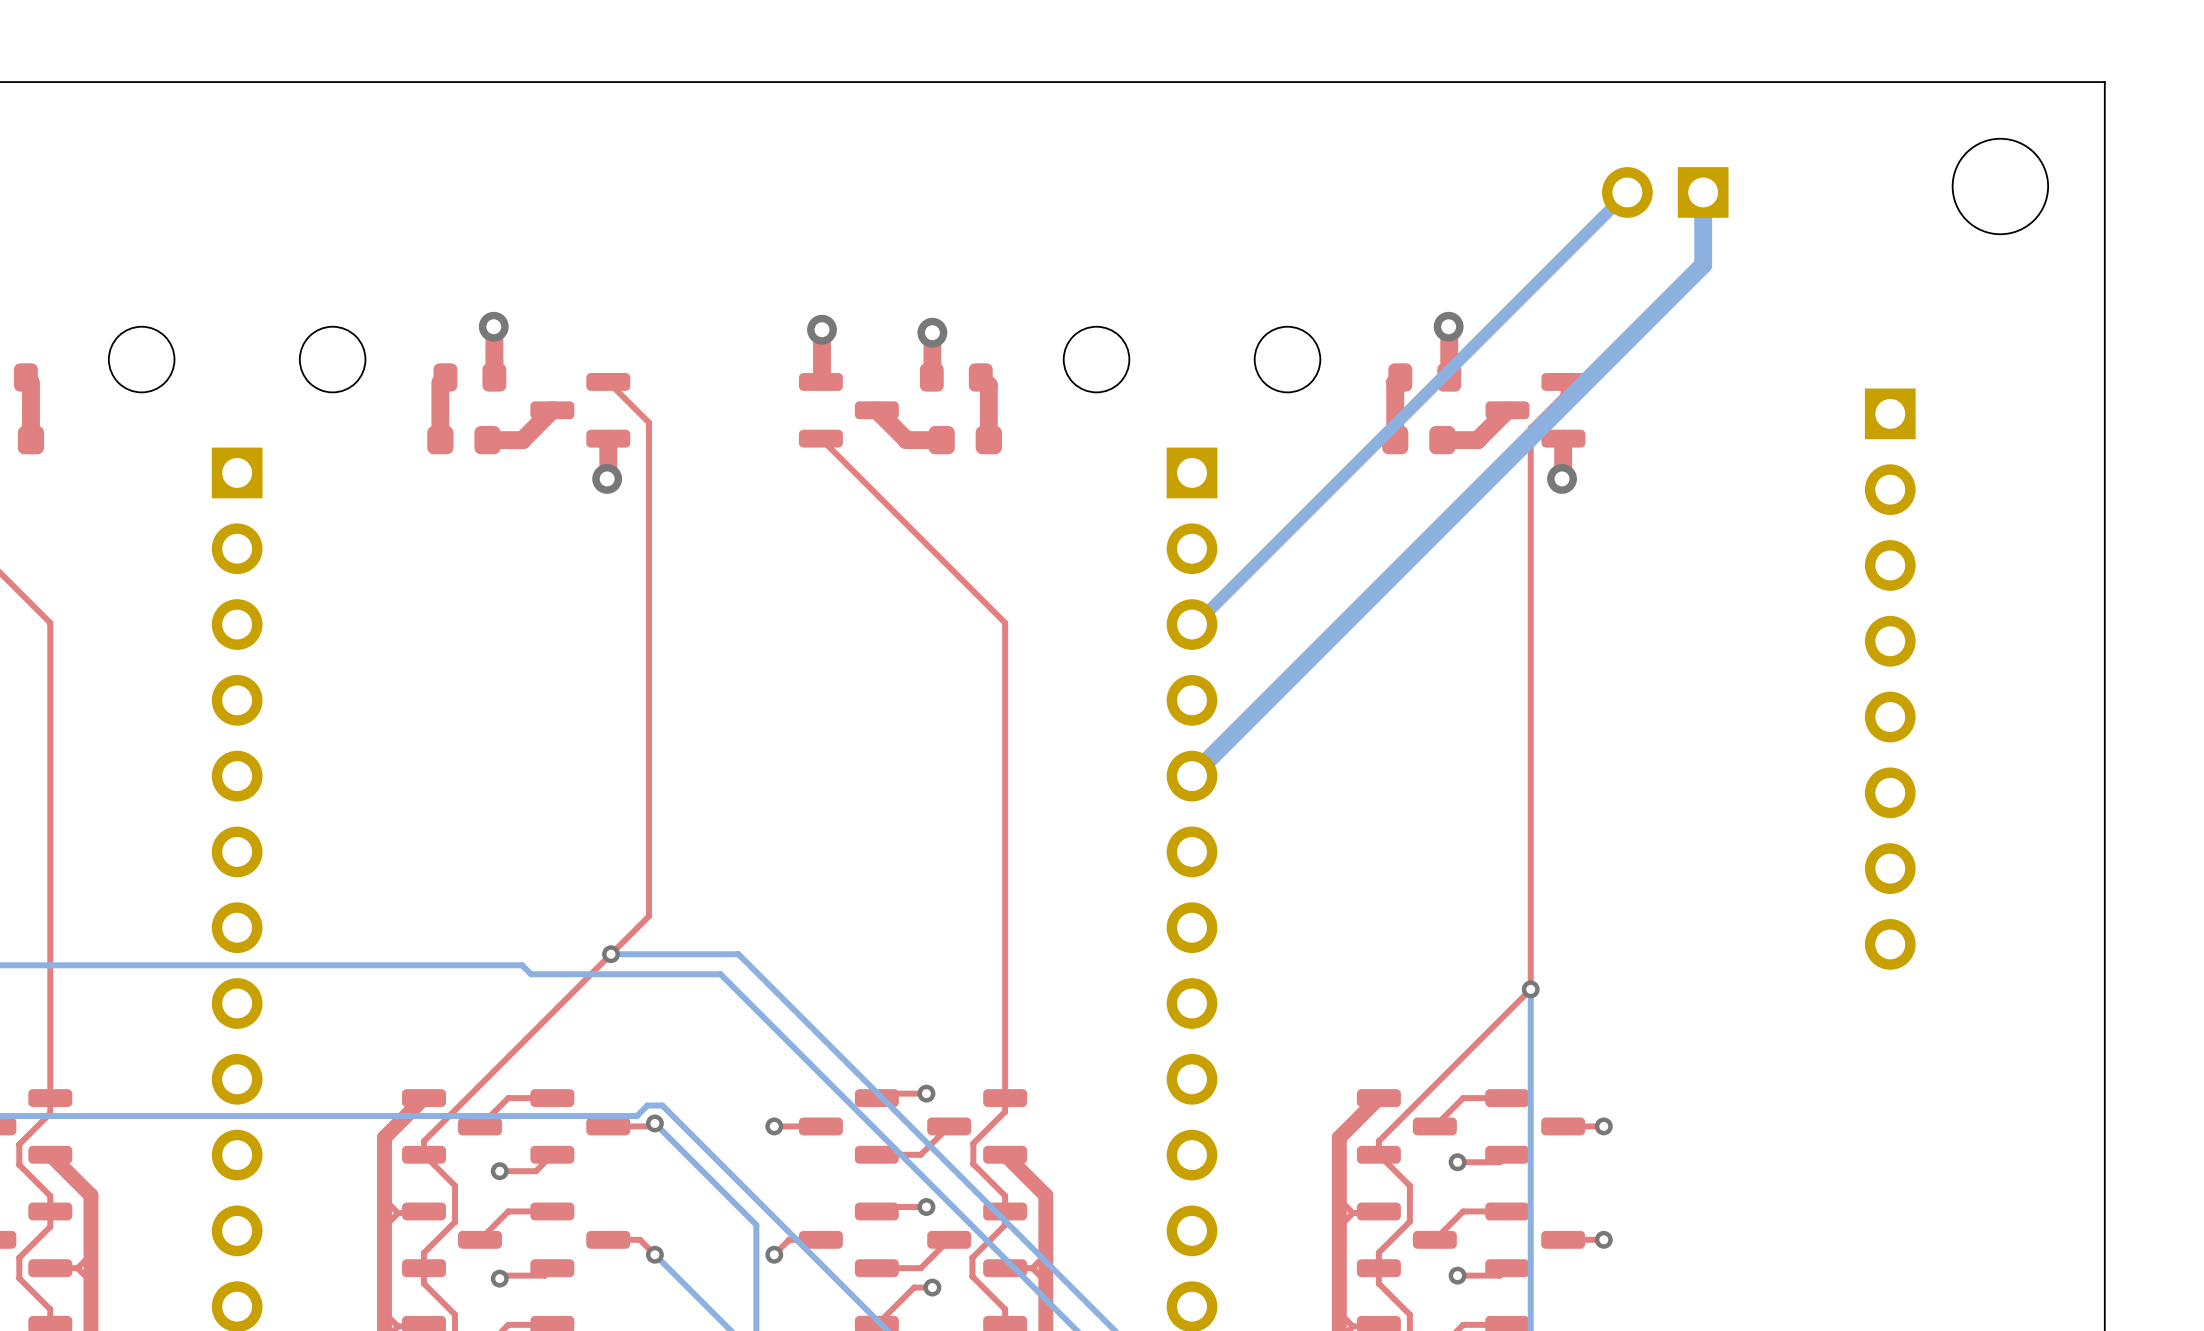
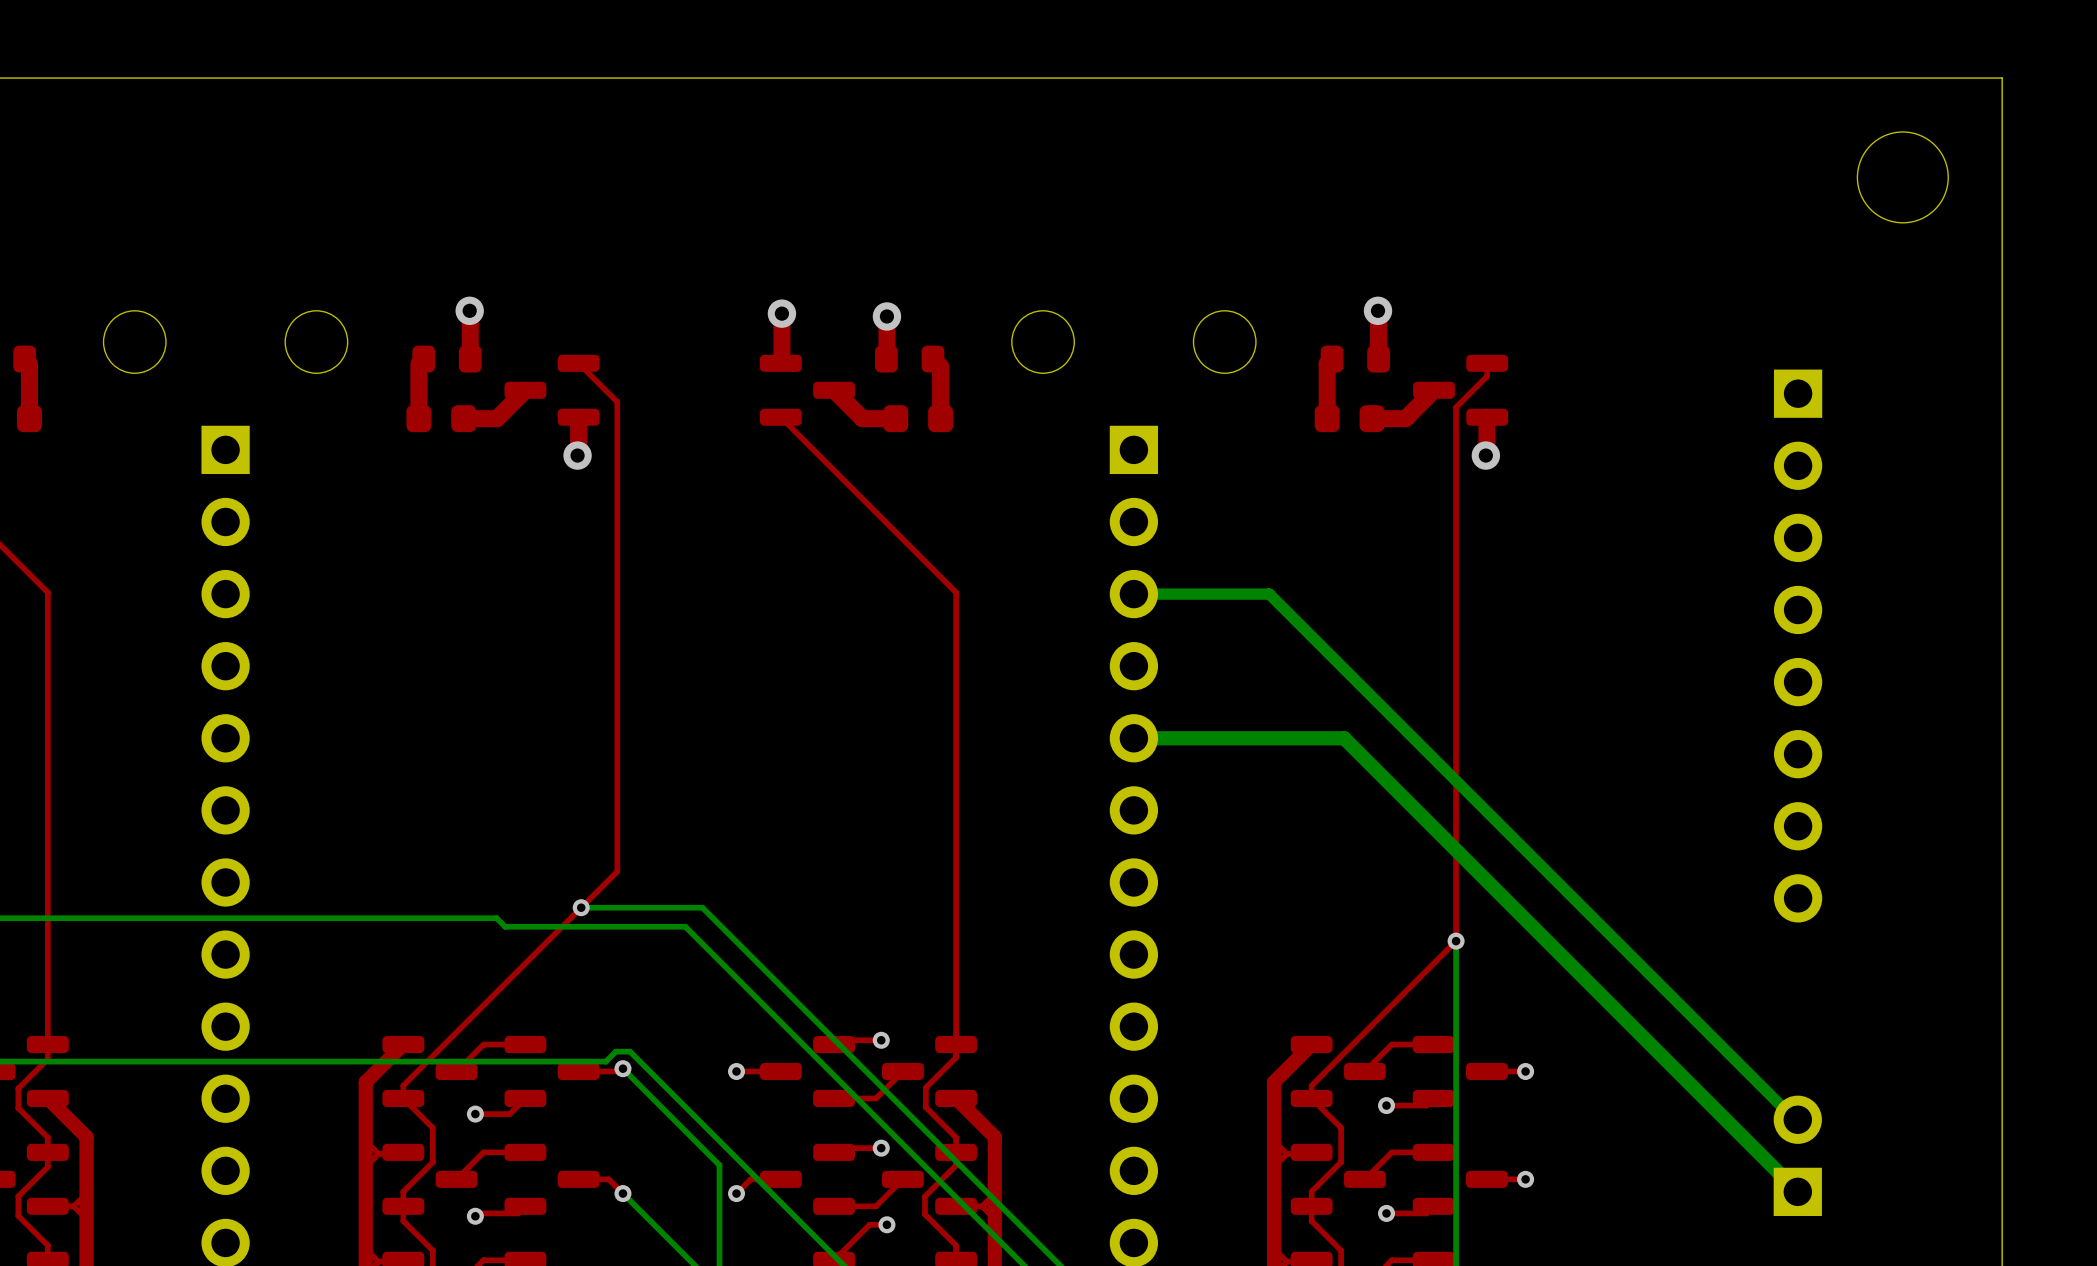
bottom track: (1627, 192) (1195, 624) -> none
part: (1665, 192) -> none
bottom track: (1703, 192) (1703, 264) (1192, 776) -> (1797, 1191) (1344, 738) (1133, 738)
bottom track: none -> (1133, 594) (1269, 594) (1794, 1119) (1797, 1119)
part: none -> (1797, 1155)

